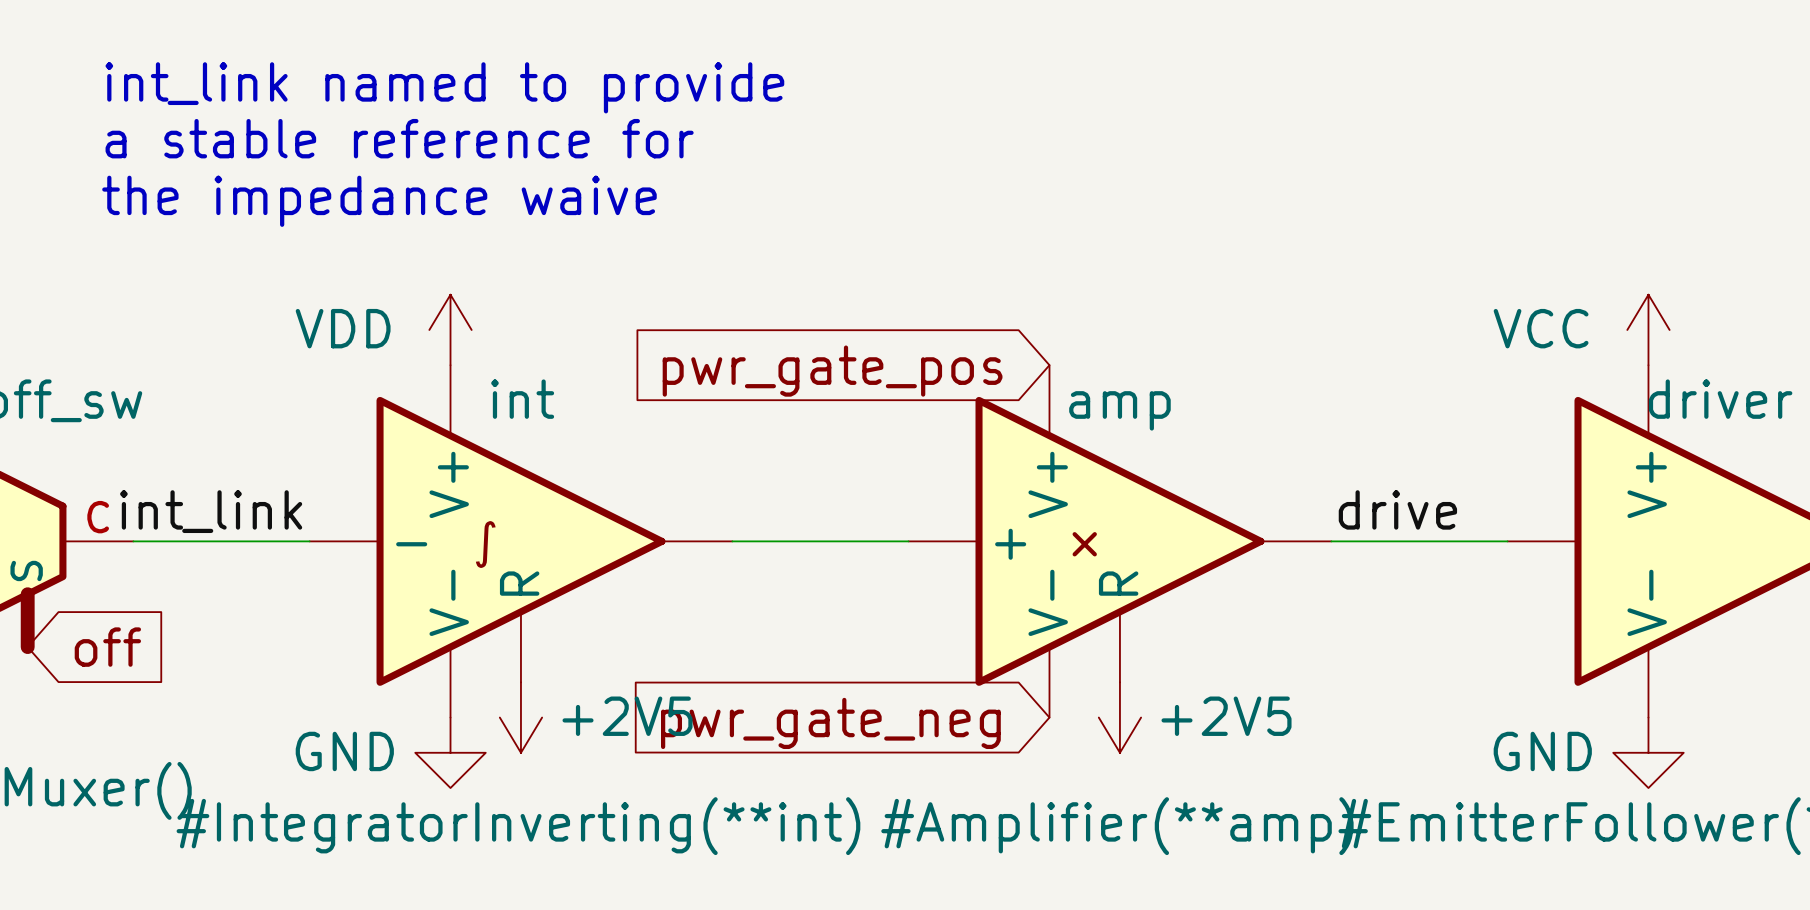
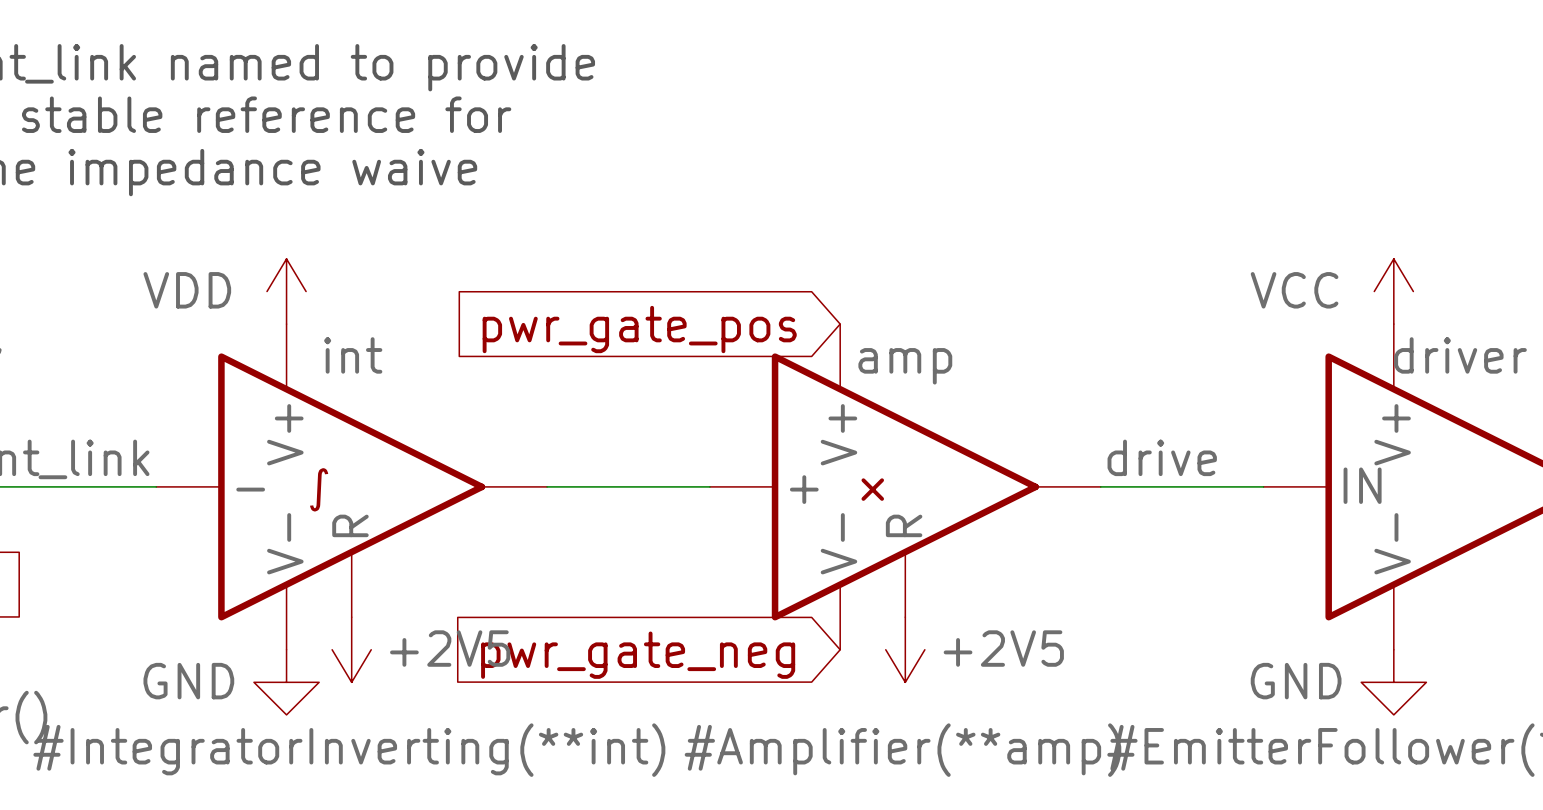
driver pin name: none -> IN (1362, 485)

